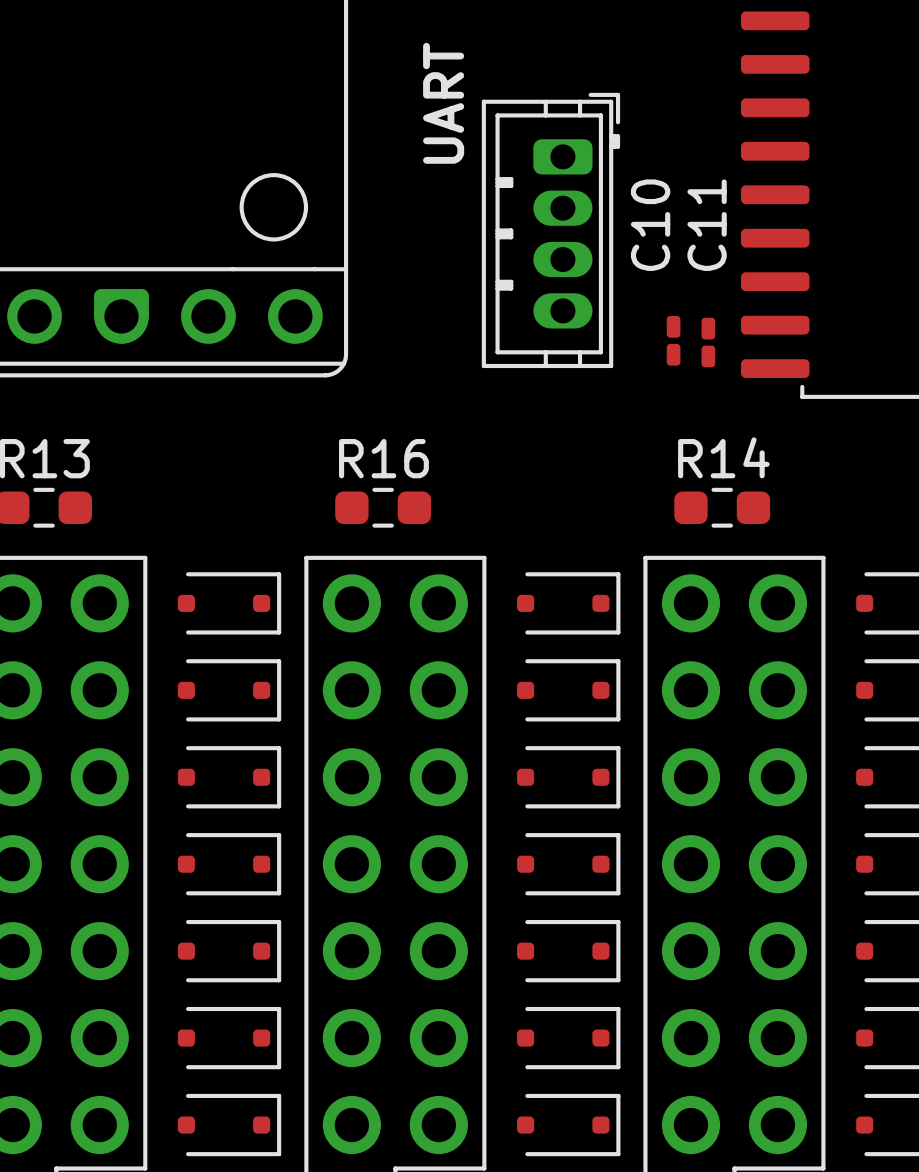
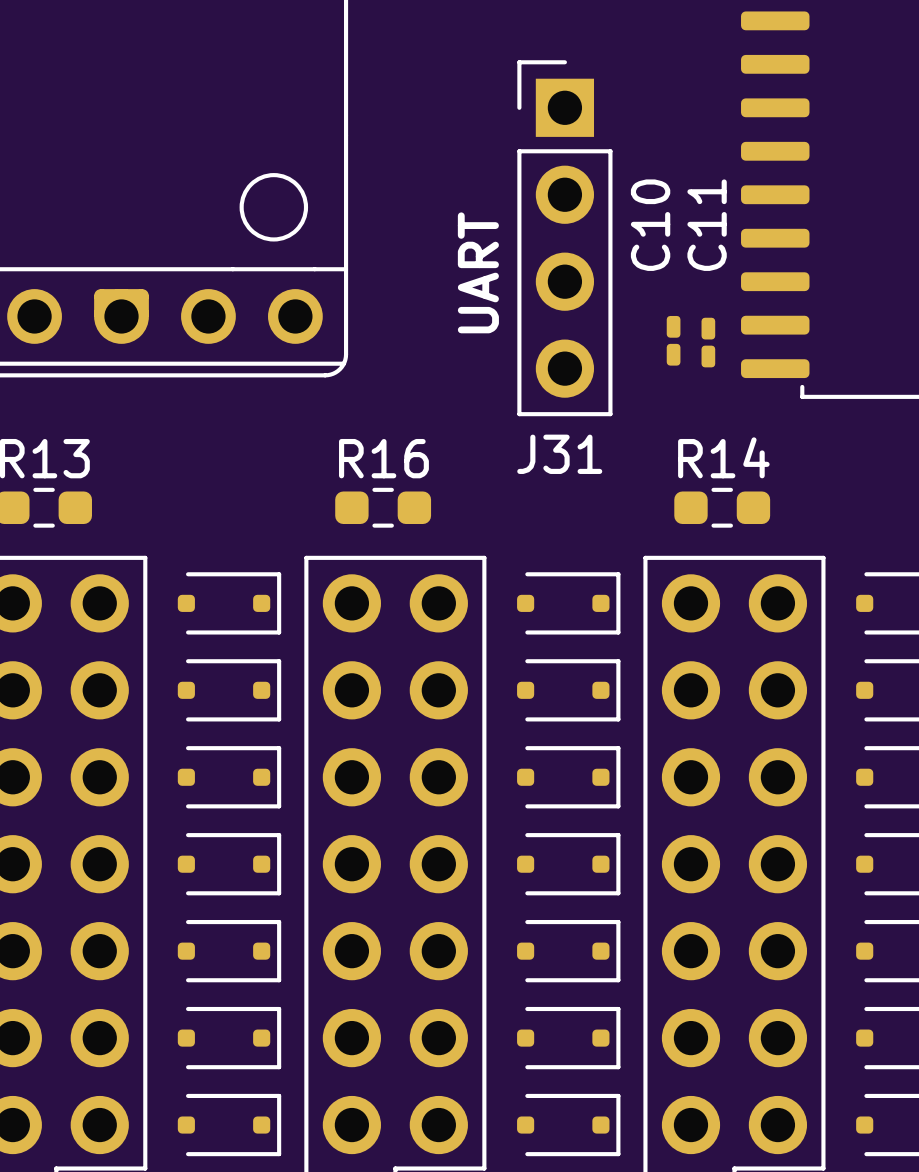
text position: UART (443, 103) -> UART (478, 272)
part: (550, 230) -> none
J31: none -> (564, 238)

